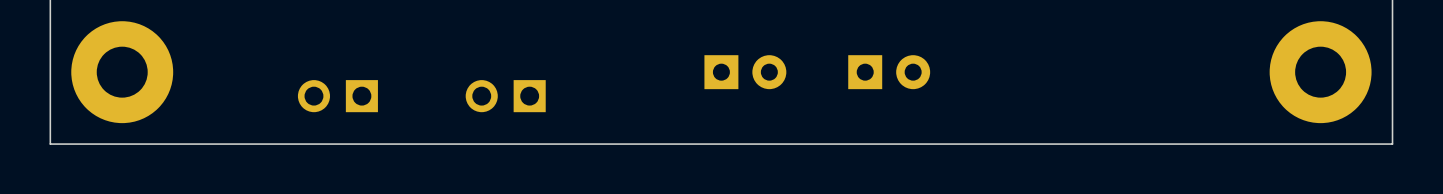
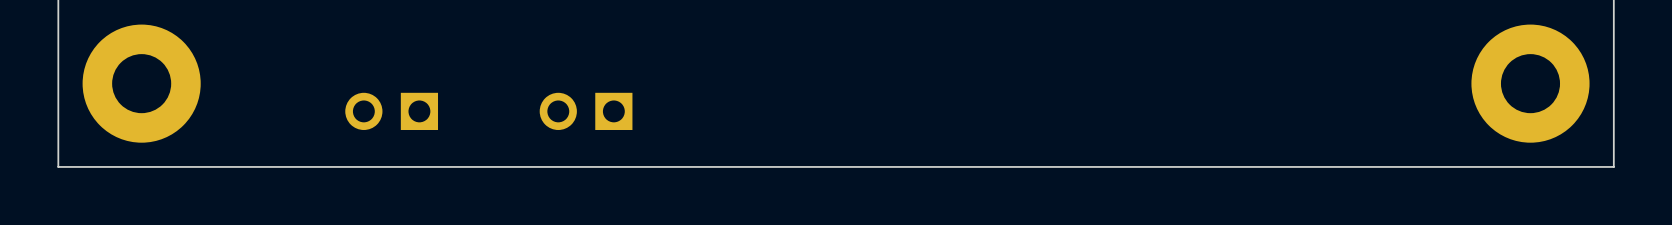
part: (745, 72) -> none
part: (889, 72) -> none

